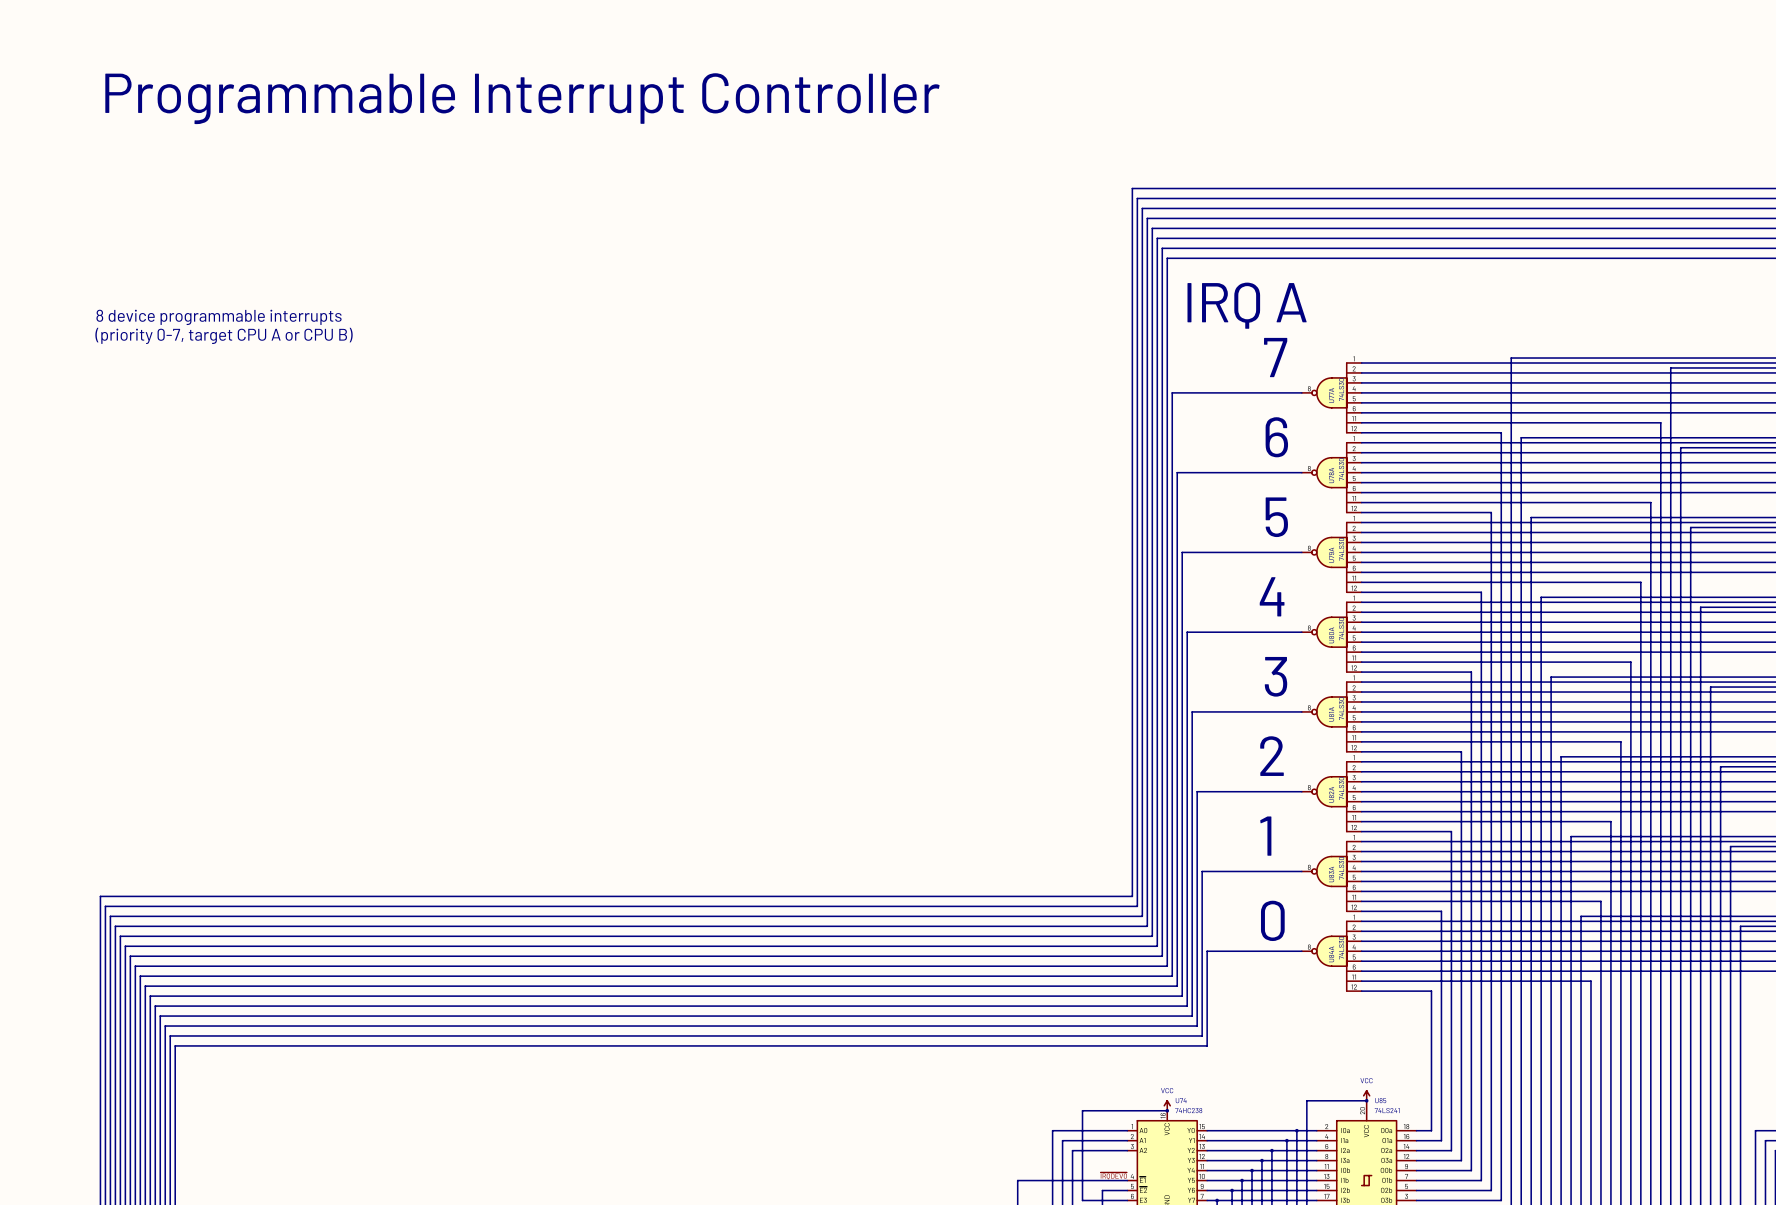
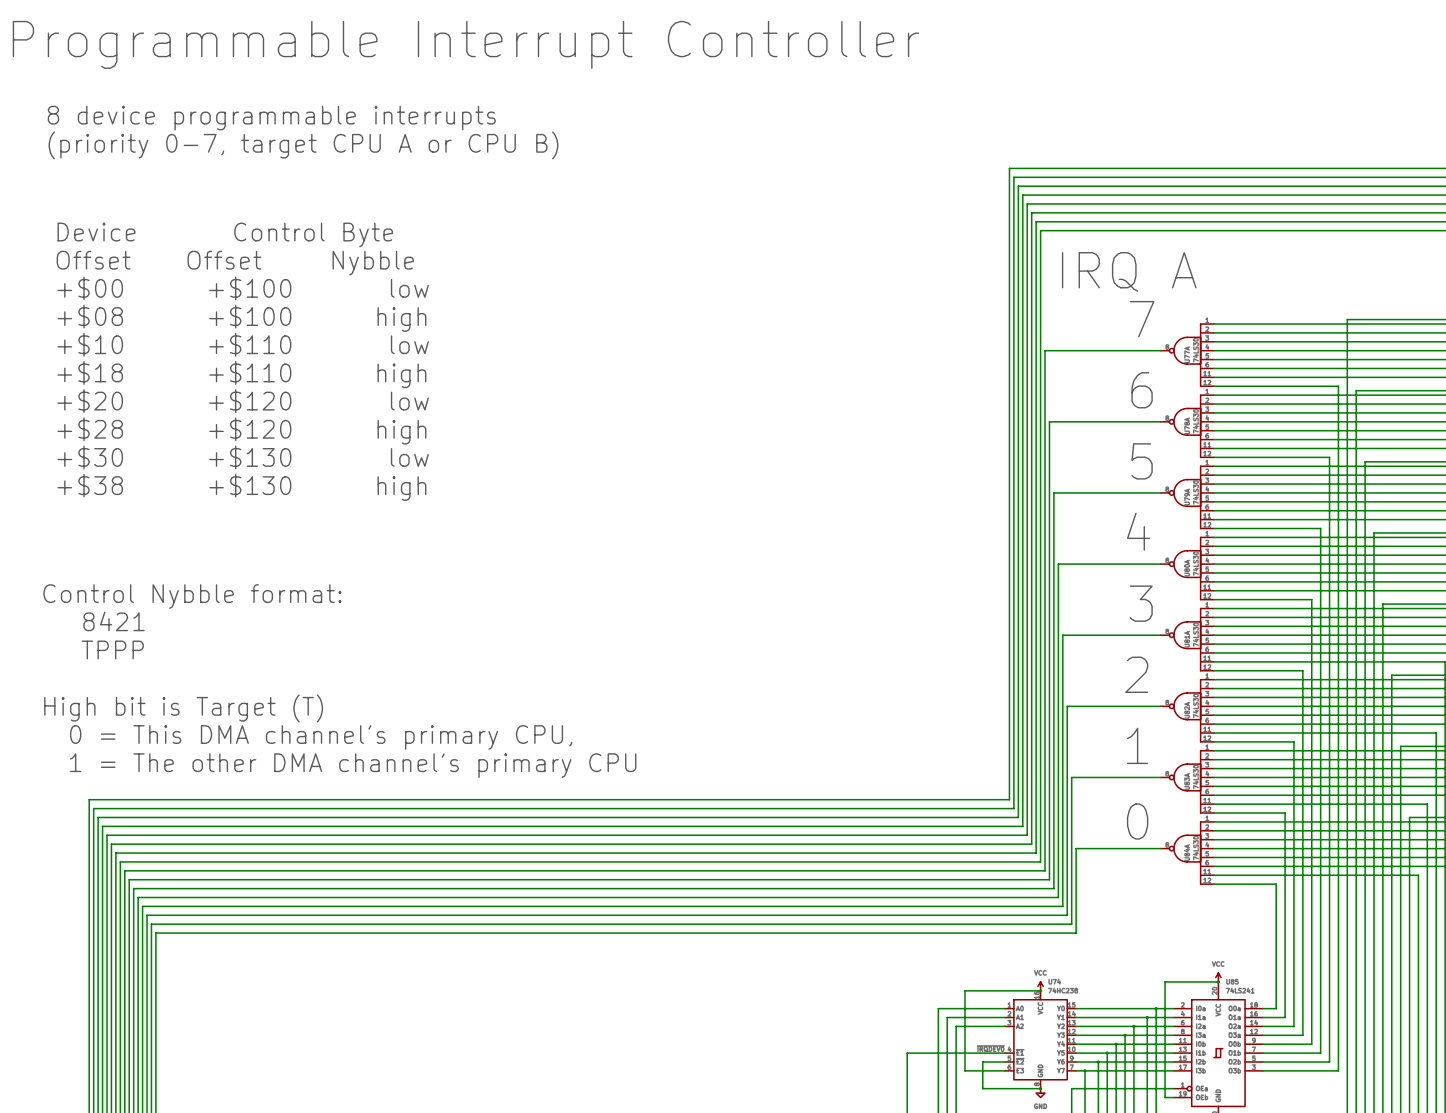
text: none -> Programmable Interrupt Controller (465, 44)
text: Programmable Interrupt Controller (522, 98) -> none
text: none -> 8 device programmable interrupts (271, 118)
text: none -> (priority 0-7, target CPU A or CPU B) (303, 145)
text: none -> Device Control Byte (225, 234)
text: none -> Offset Offset Nybble (235, 263)
text: 8 device programmable interrupts (219, 317) -> none
text: none -> +$00 +$100 low (243, 288)
text: (priority 0-7, target CPU A or CPU B) (224, 335) -> none
text: none -> +$08 +$100 high (241, 318)
text: none -> +$10 +$110 low (243, 344)
text: none -> +$18 +$110 high (241, 374)
text: none -> +$20 +$120 low (243, 401)
text: none -> +$28 +$120 high (241, 430)
text: none -> +$30 +$130 low (243, 457)
text: none -> +$38 +$130 high (241, 487)
text: none -> Control Nybble format: (192, 596)
text: none -> 8421 (114, 621)
text: none -> TPPP (112, 649)
text: none -> High bit is Target (T) (183, 708)
text: none -> 0 = This DMA channel's primary CPU, (321, 737)
text: none -> 1 = The other DMA channel's primary CPU (353, 765)

